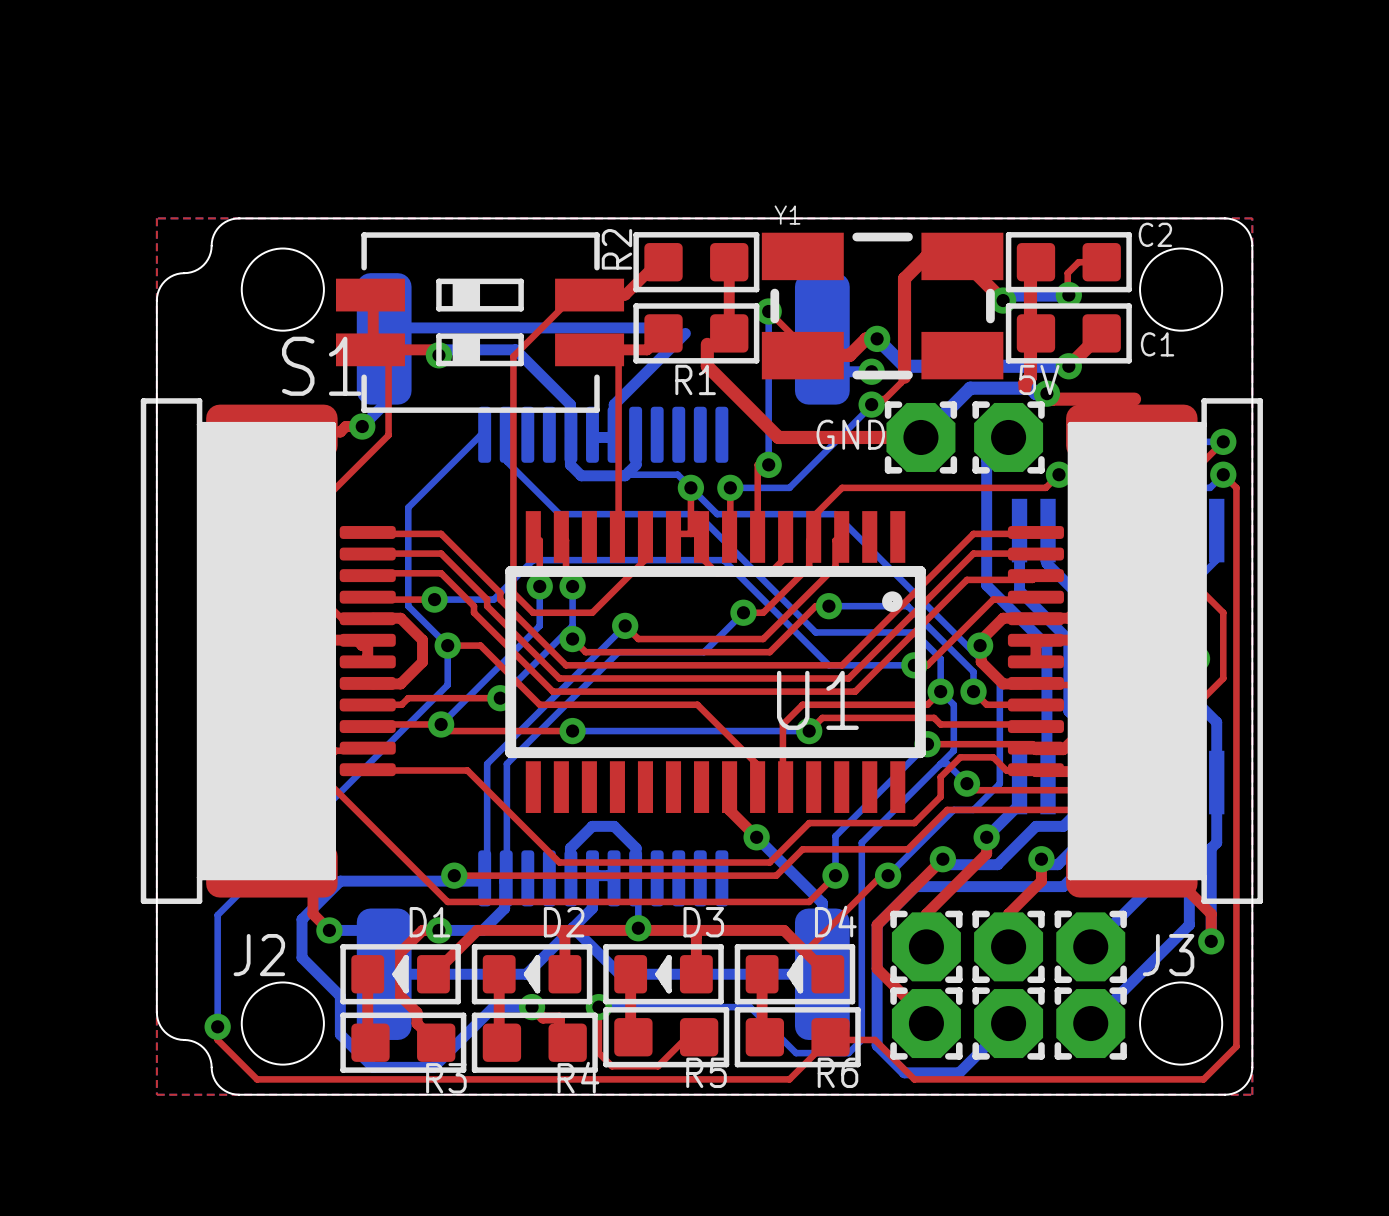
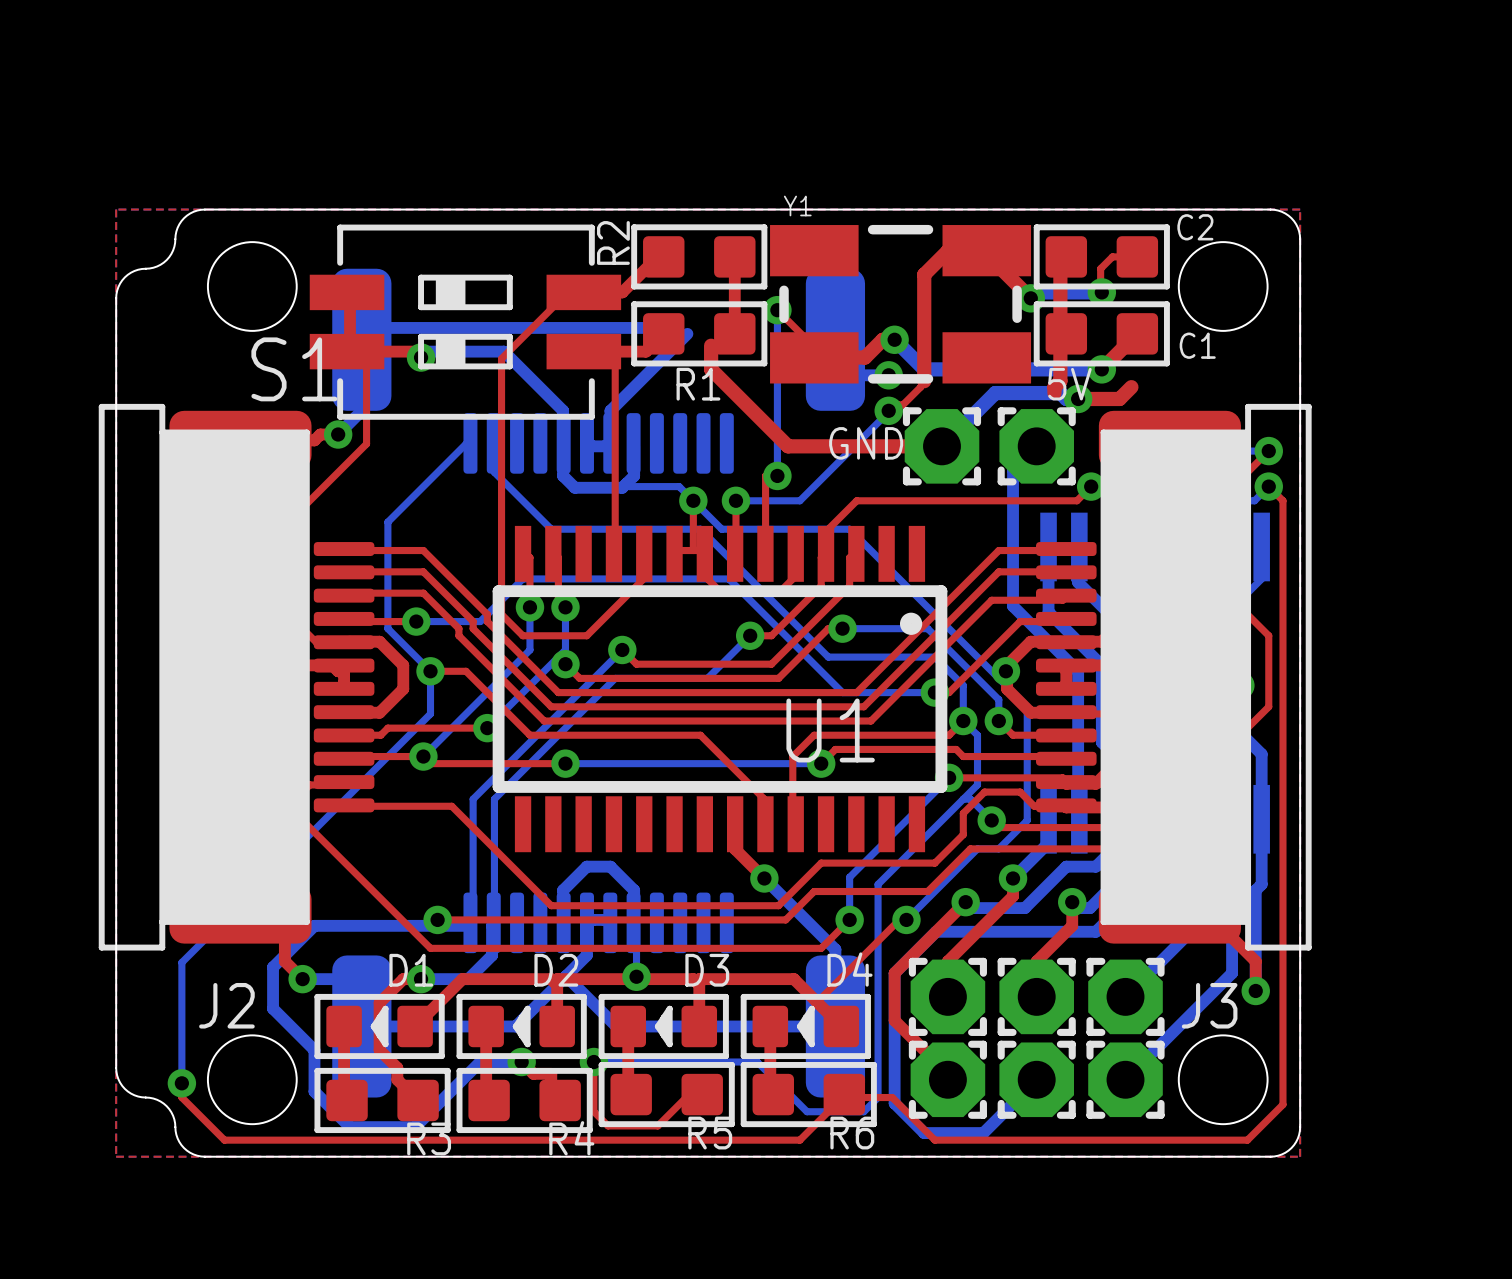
top track: (1046, 393) (1052, 399) (1134, 399) -> (1078, 398) (1119, 398) (1131, 387)

